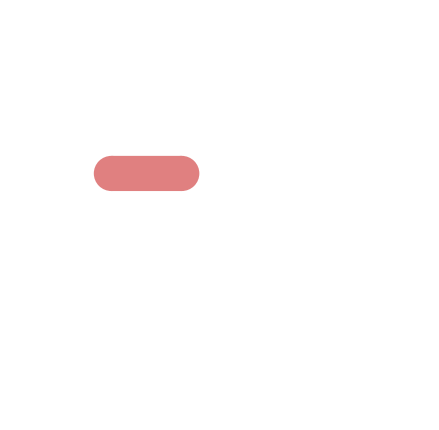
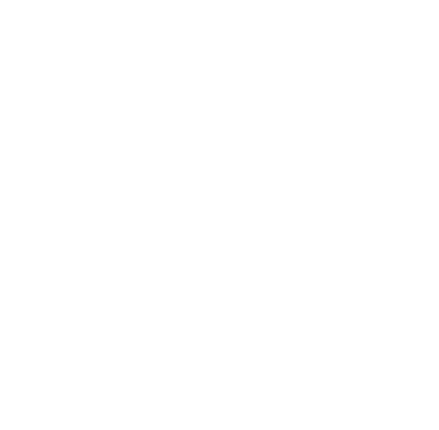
part: (146, 173) -> none

